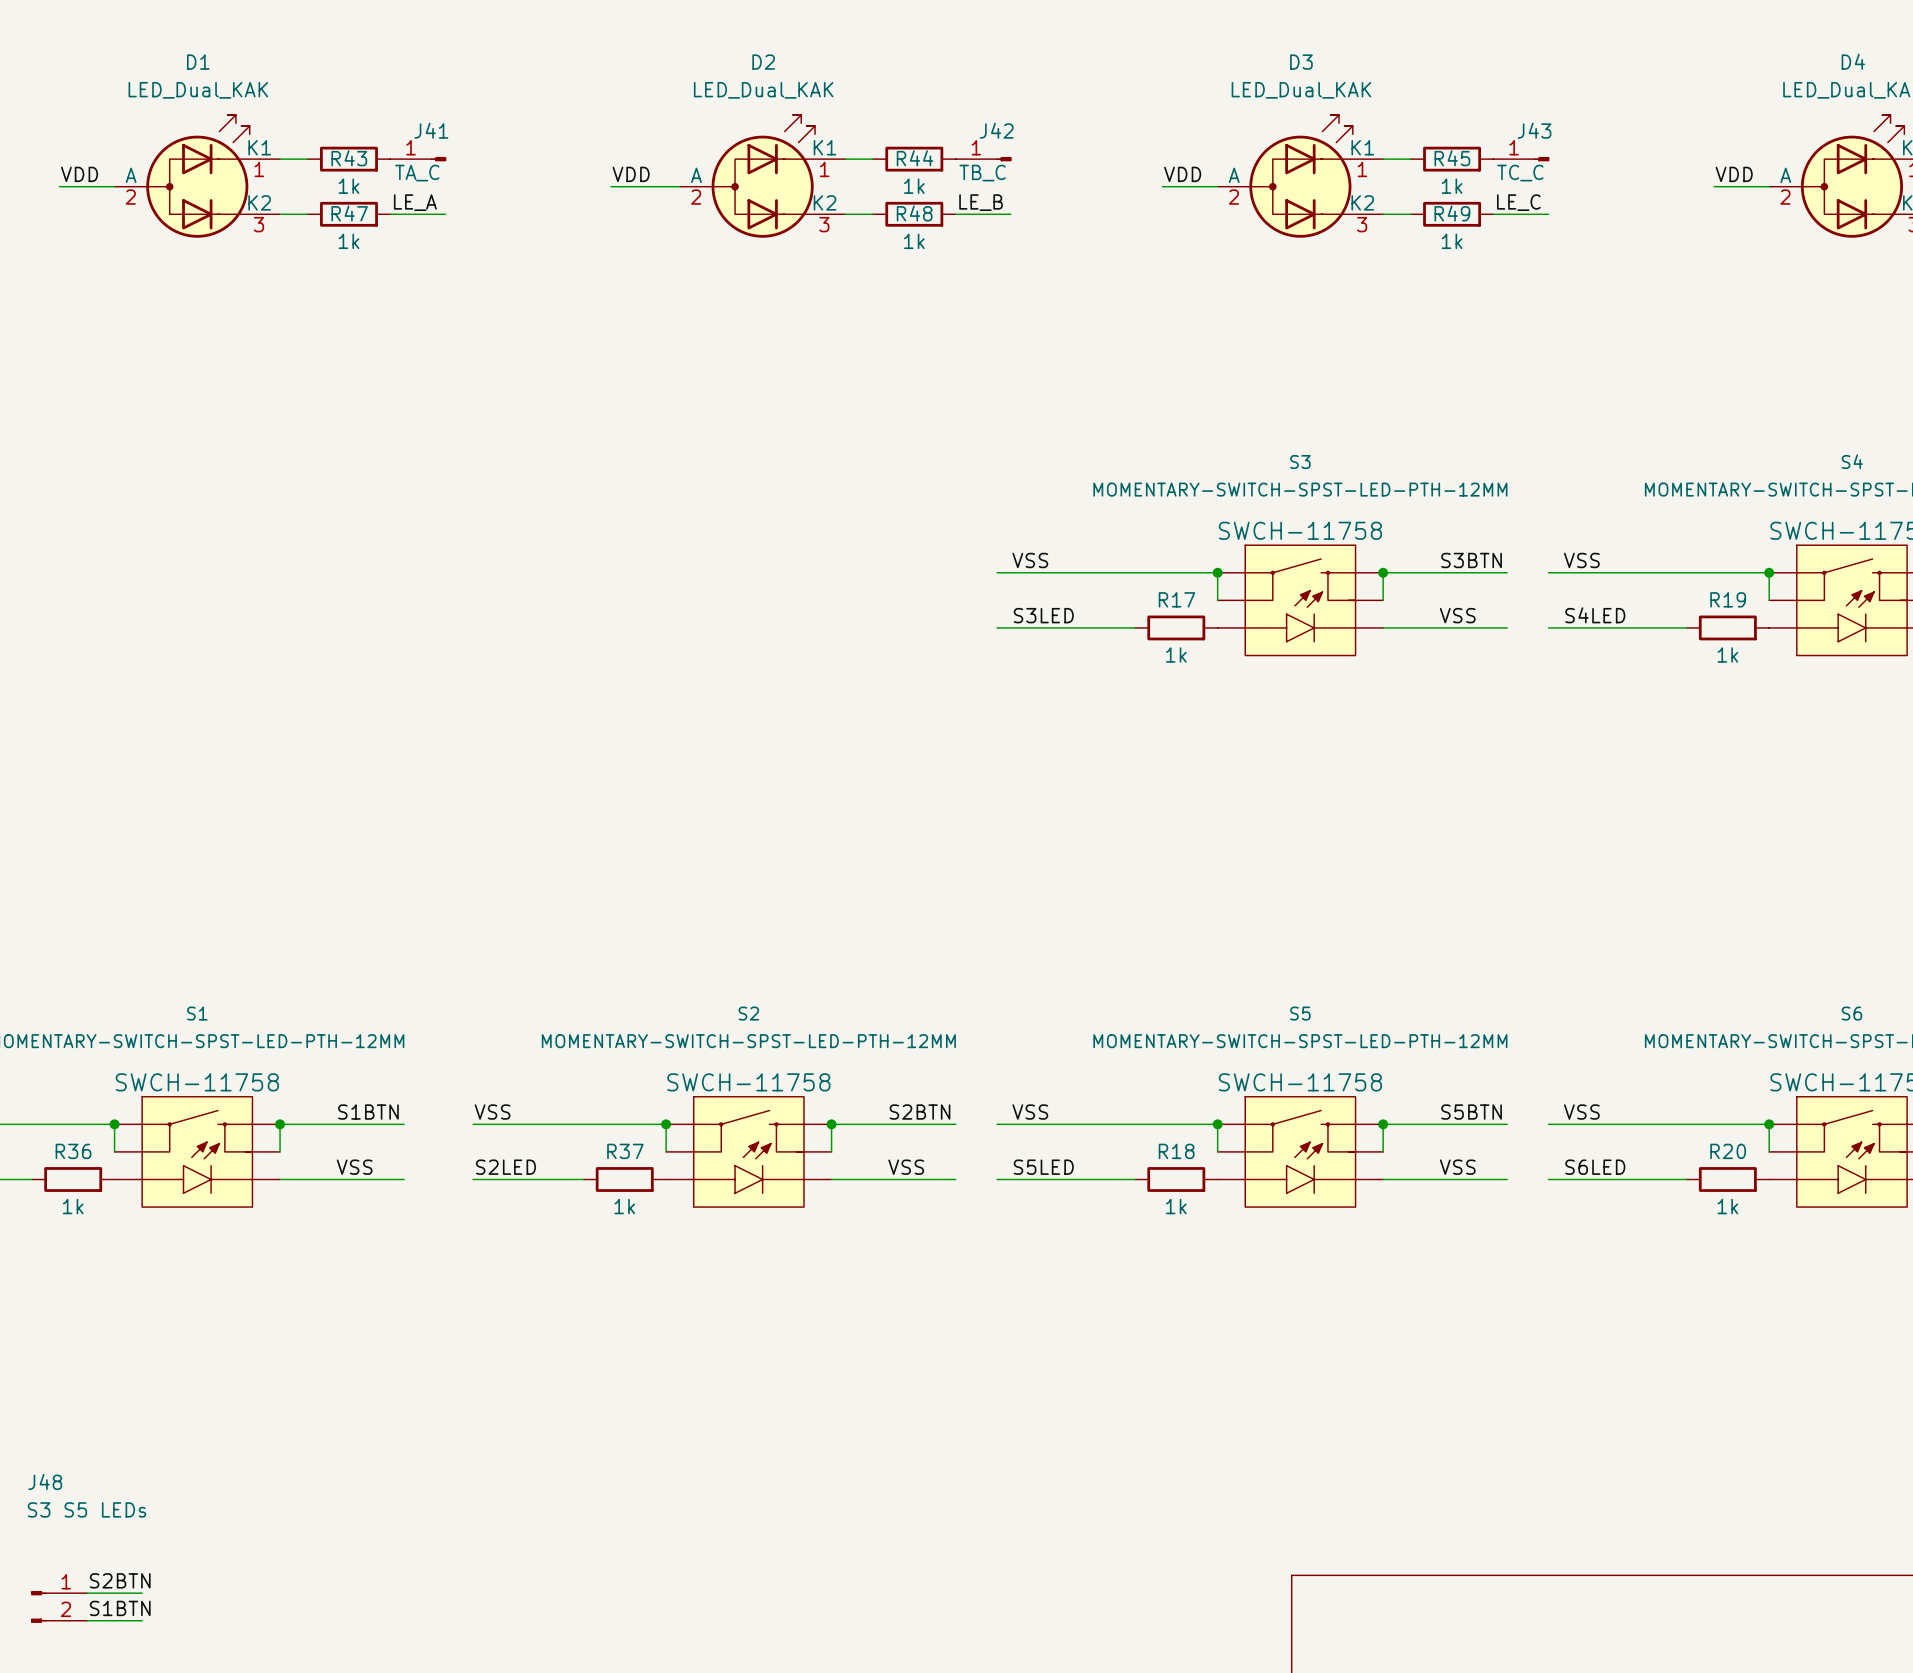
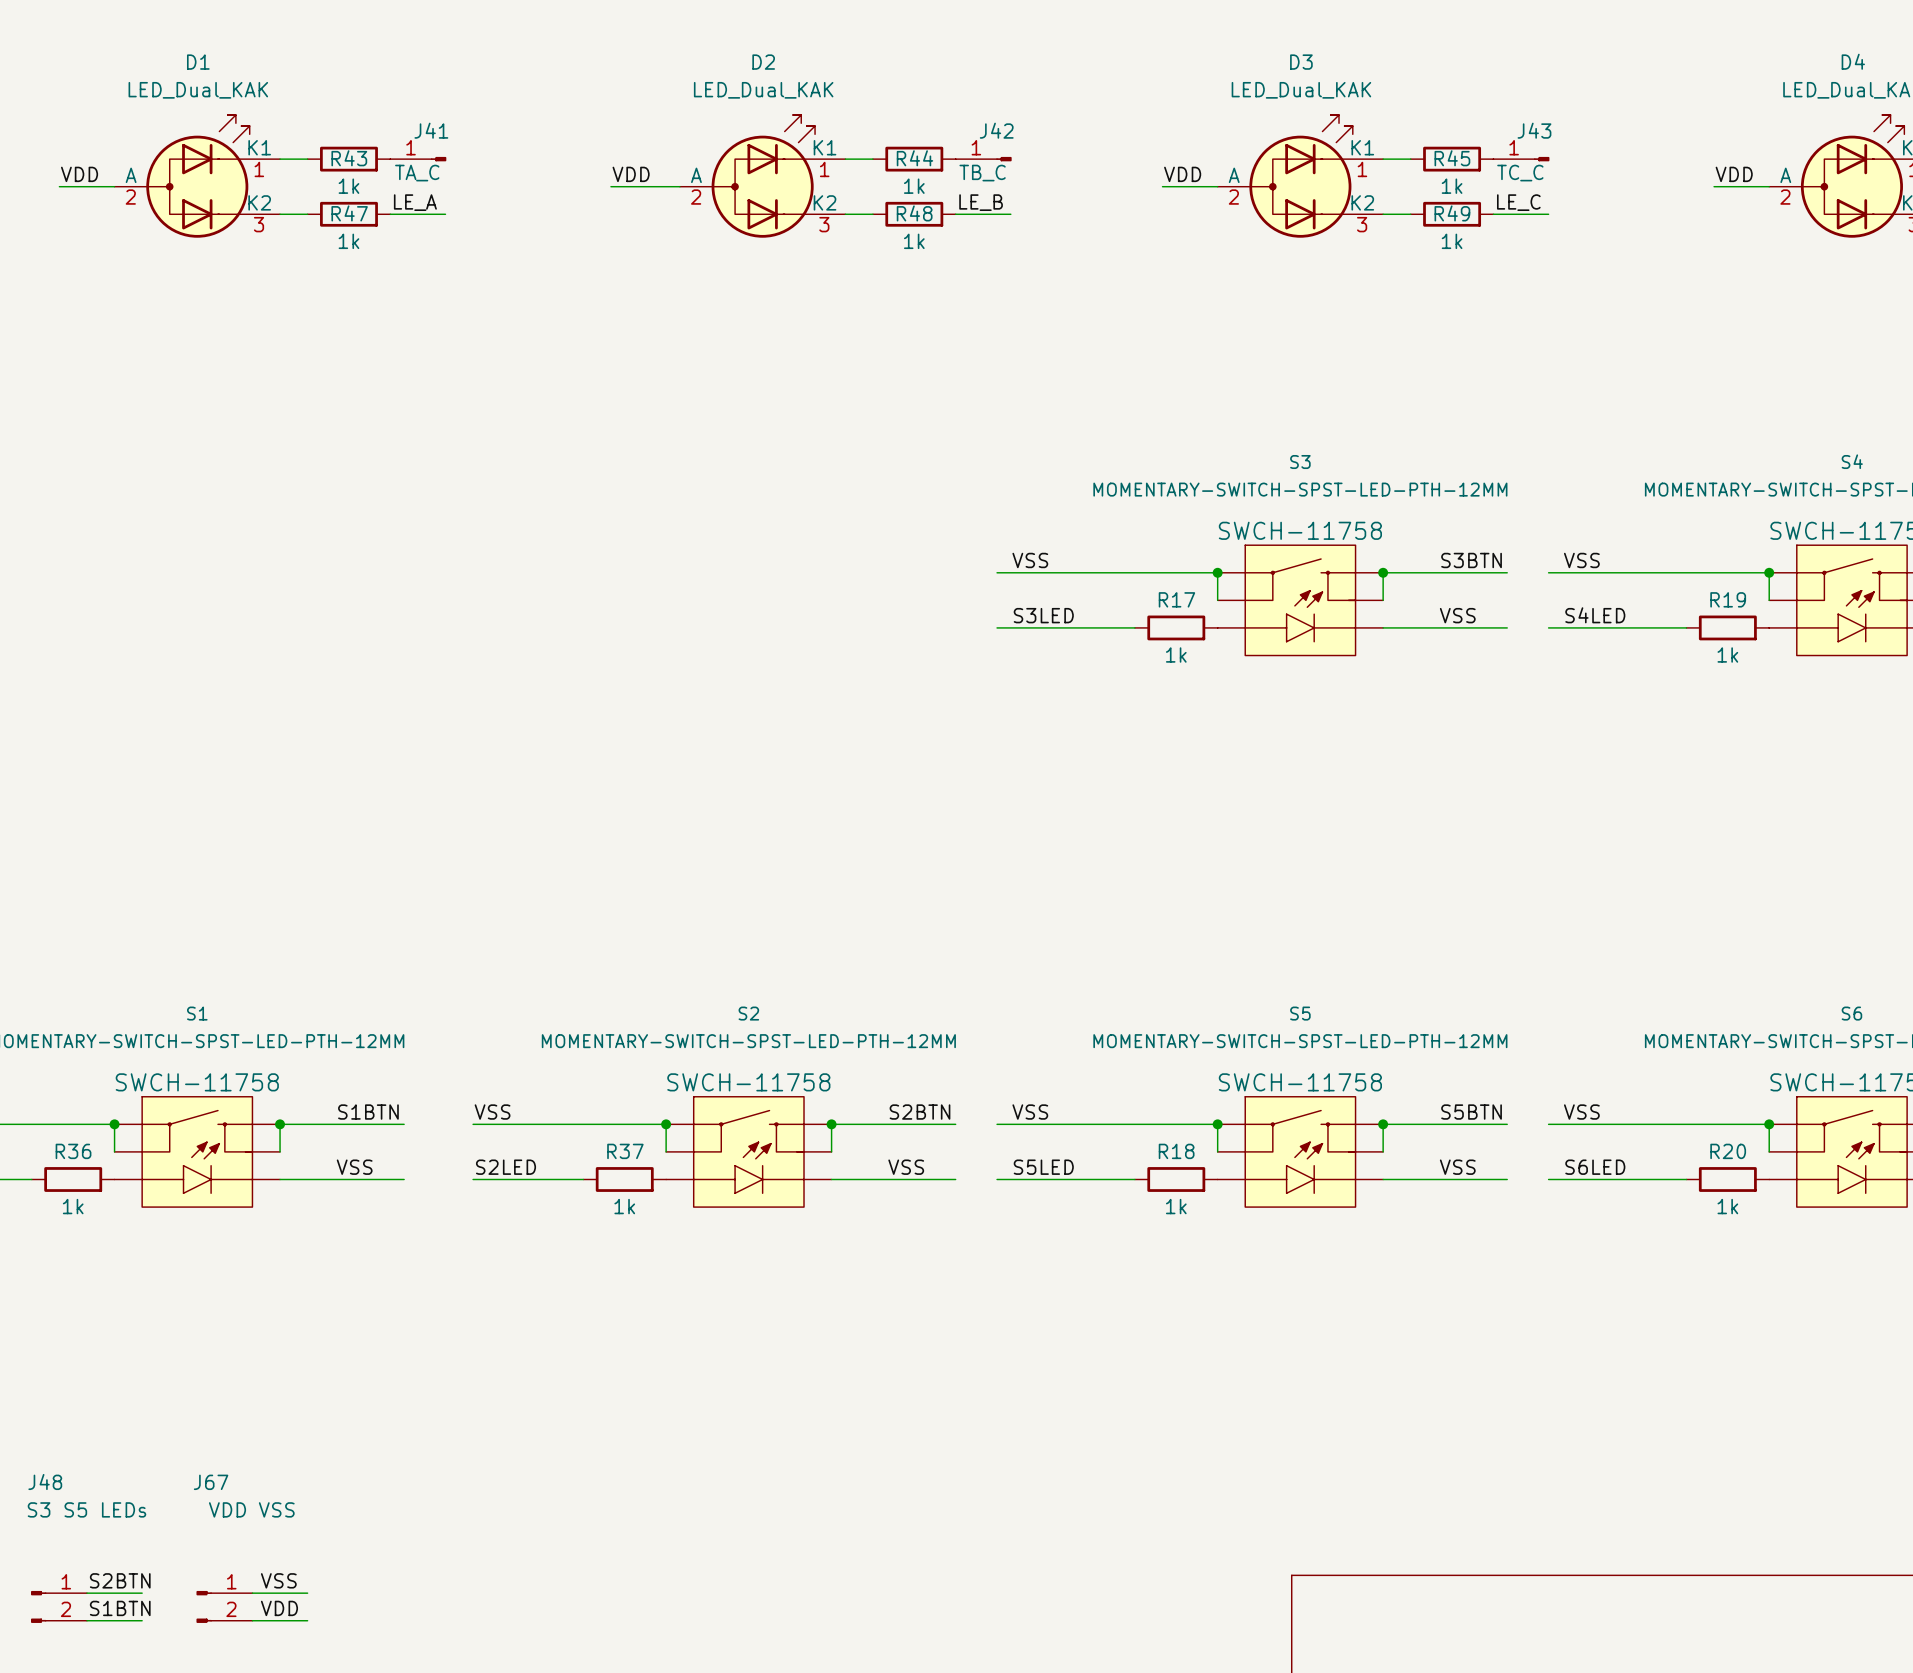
label: none -> VSS (278, 1580)
wire: none -> (252, 1593) (307, 1593)
J67: none -> VDD VSS (224, 1606)
label: none -> VDD (279, 1608)
wire: none -> (252, 1620) (307, 1620)

